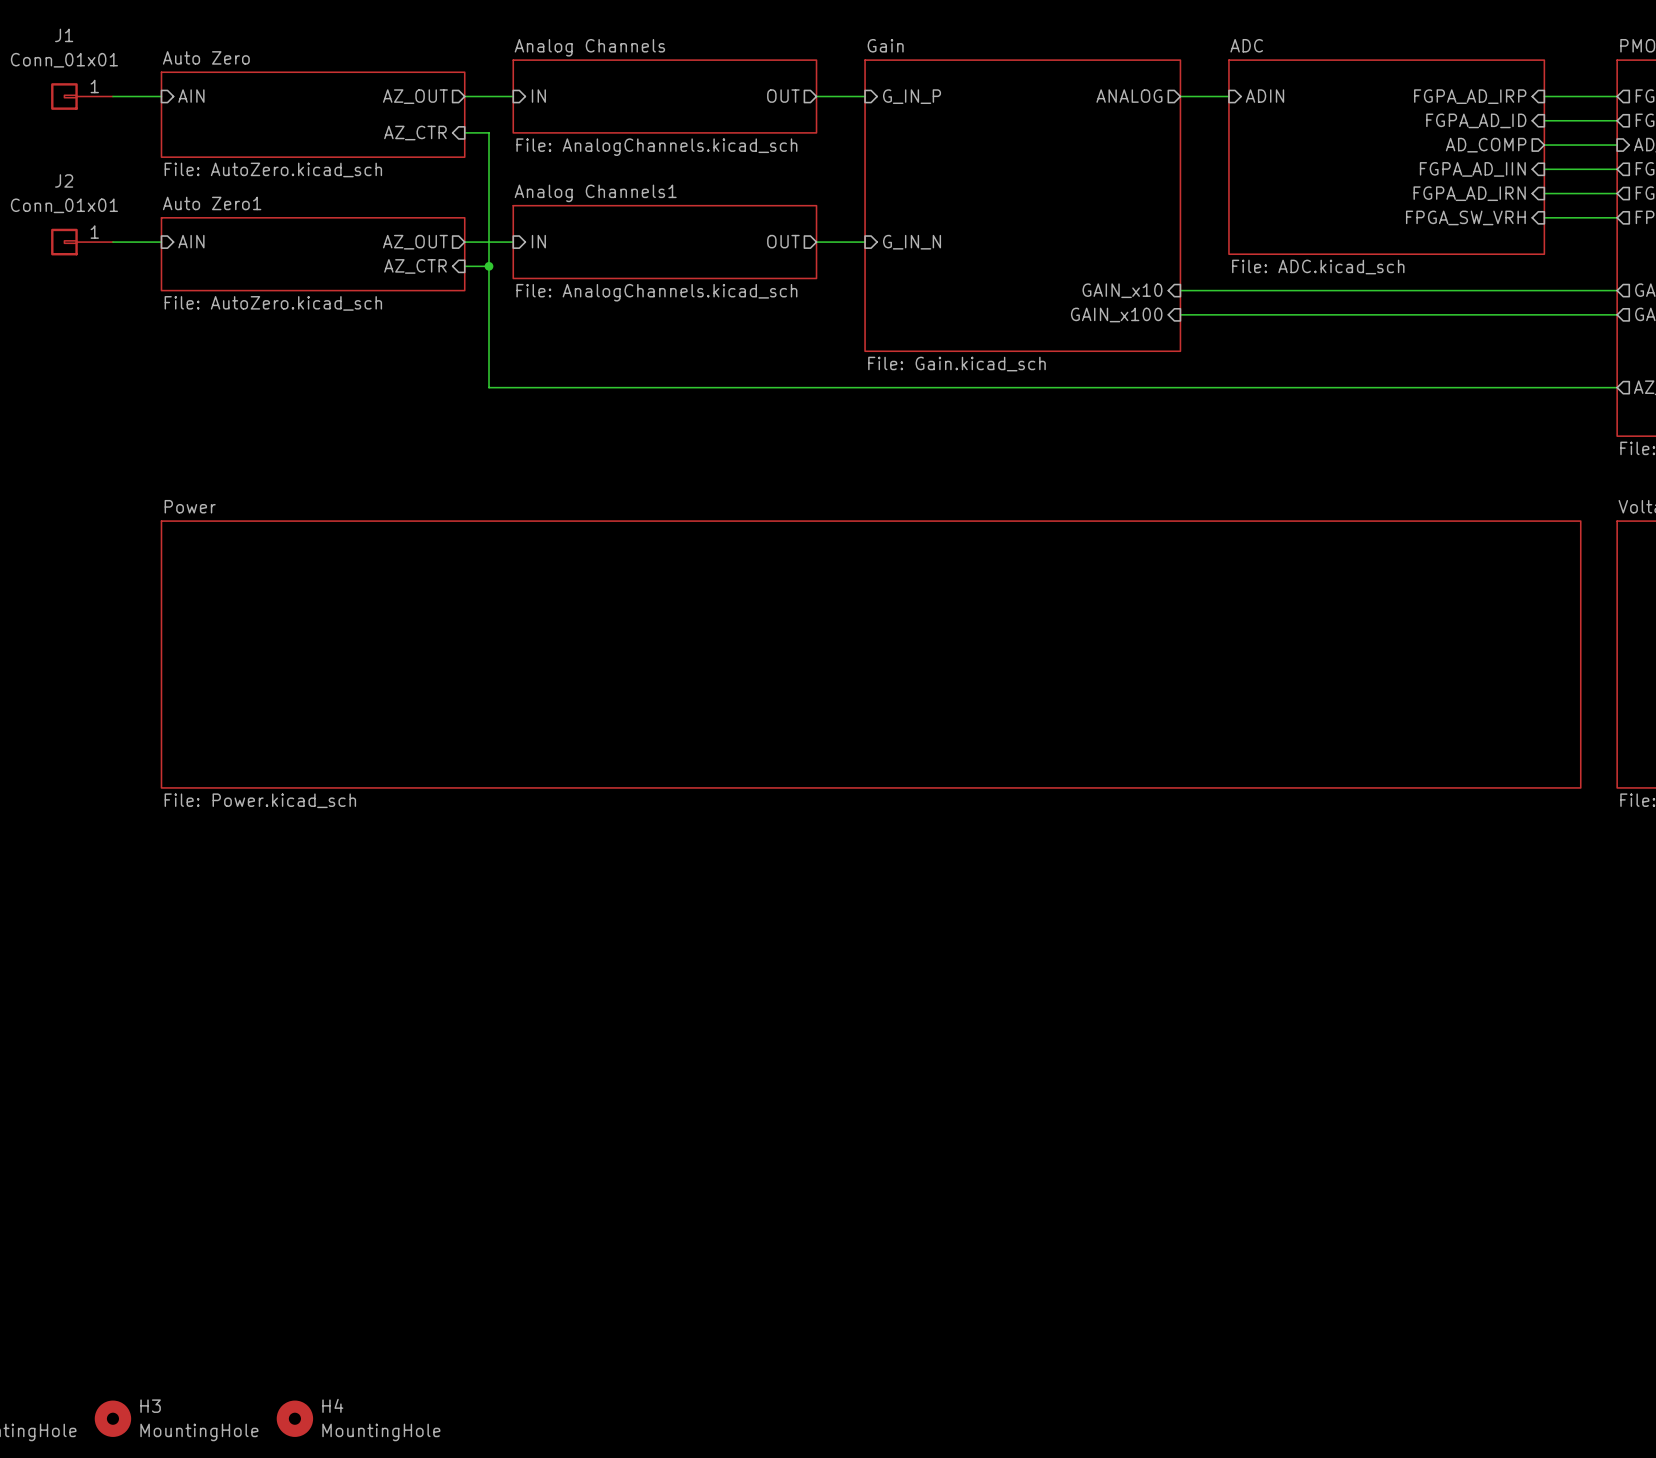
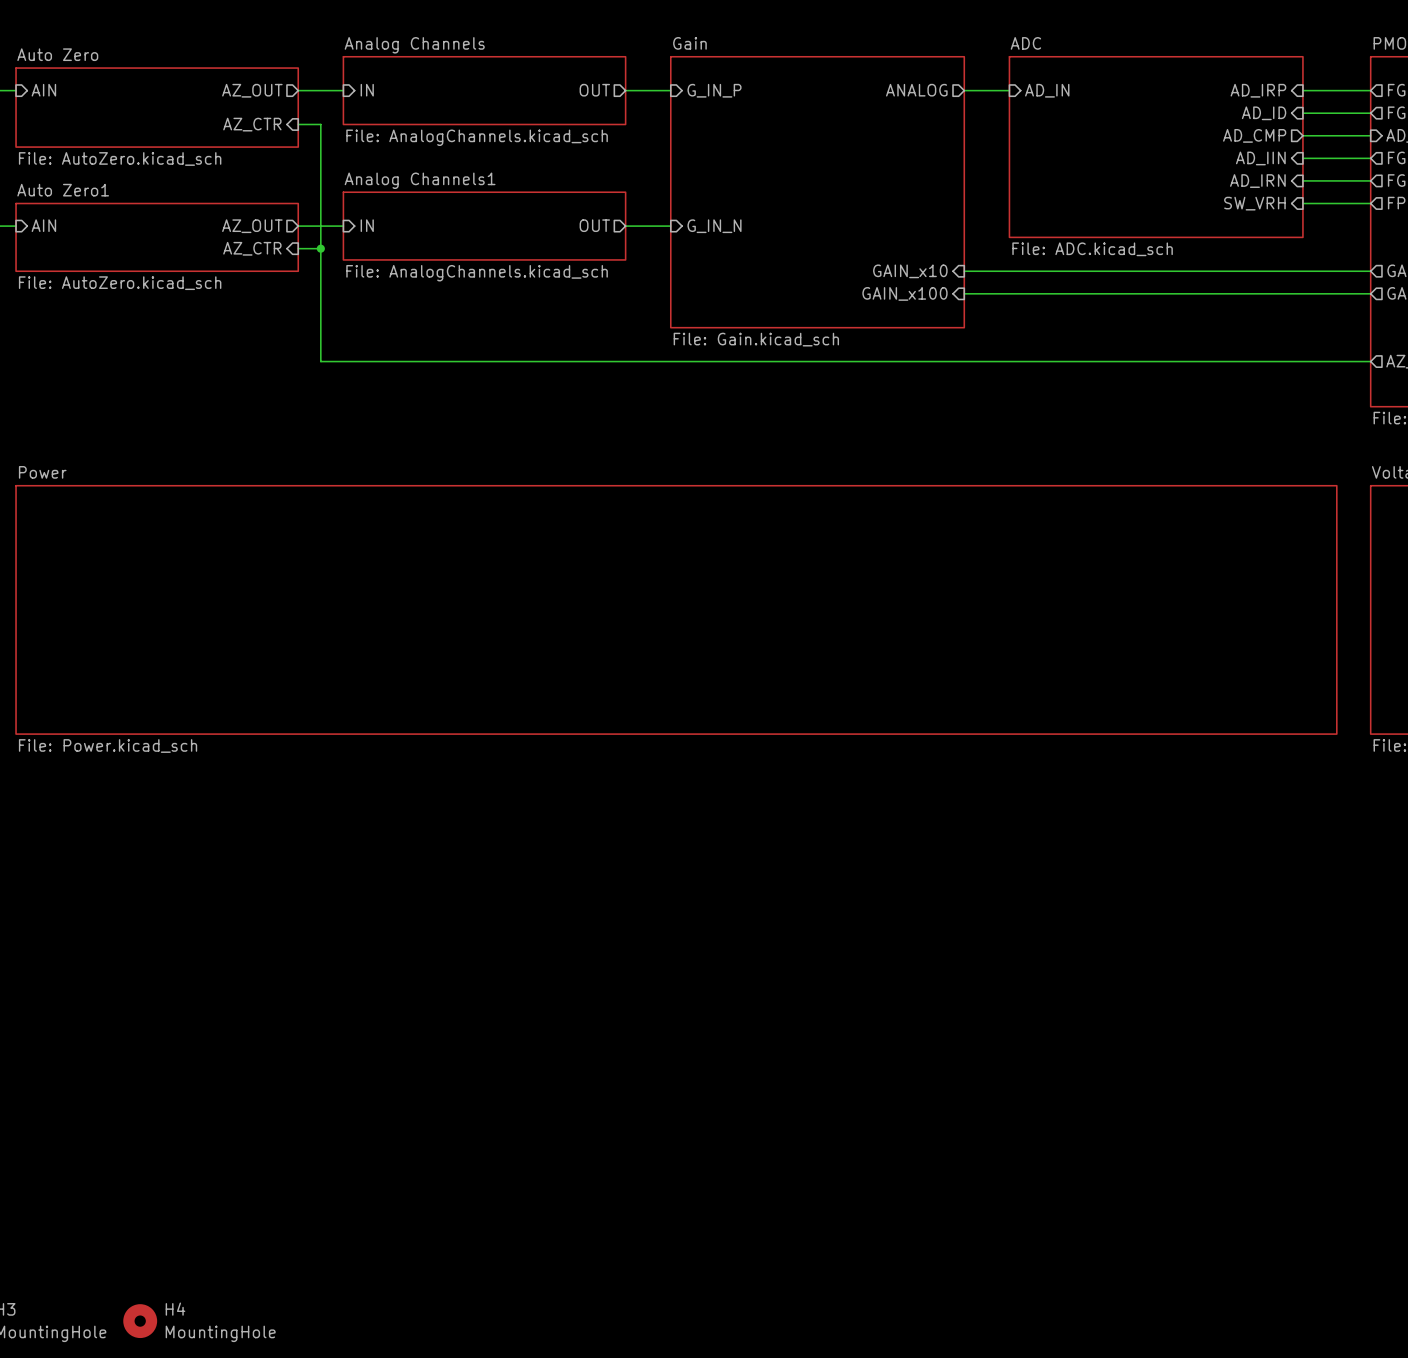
sheet pin: ADIN (1264, 96) -> AD_IN (1047, 90)
sheet pin: FGPA_AD_IRP (1470, 96) -> AD_IRP (1258, 90)
sheet pin: FGPA_AD_ID (1476, 120) -> AD_ID (1264, 113)
sheet pin: AD_COMP (1486, 145) -> AD_CMP (1254, 135)
sheet pin: FGPA_AD_IIN (1472, 169) -> AD_IIN (1260, 158)
sheet pin: FGPA_AD_IRN (1469, 193) -> AD_IRN (1257, 181)
sheet pin: FPGA_SW_VRH (1465, 217) -> SW_VRH (1254, 203)

